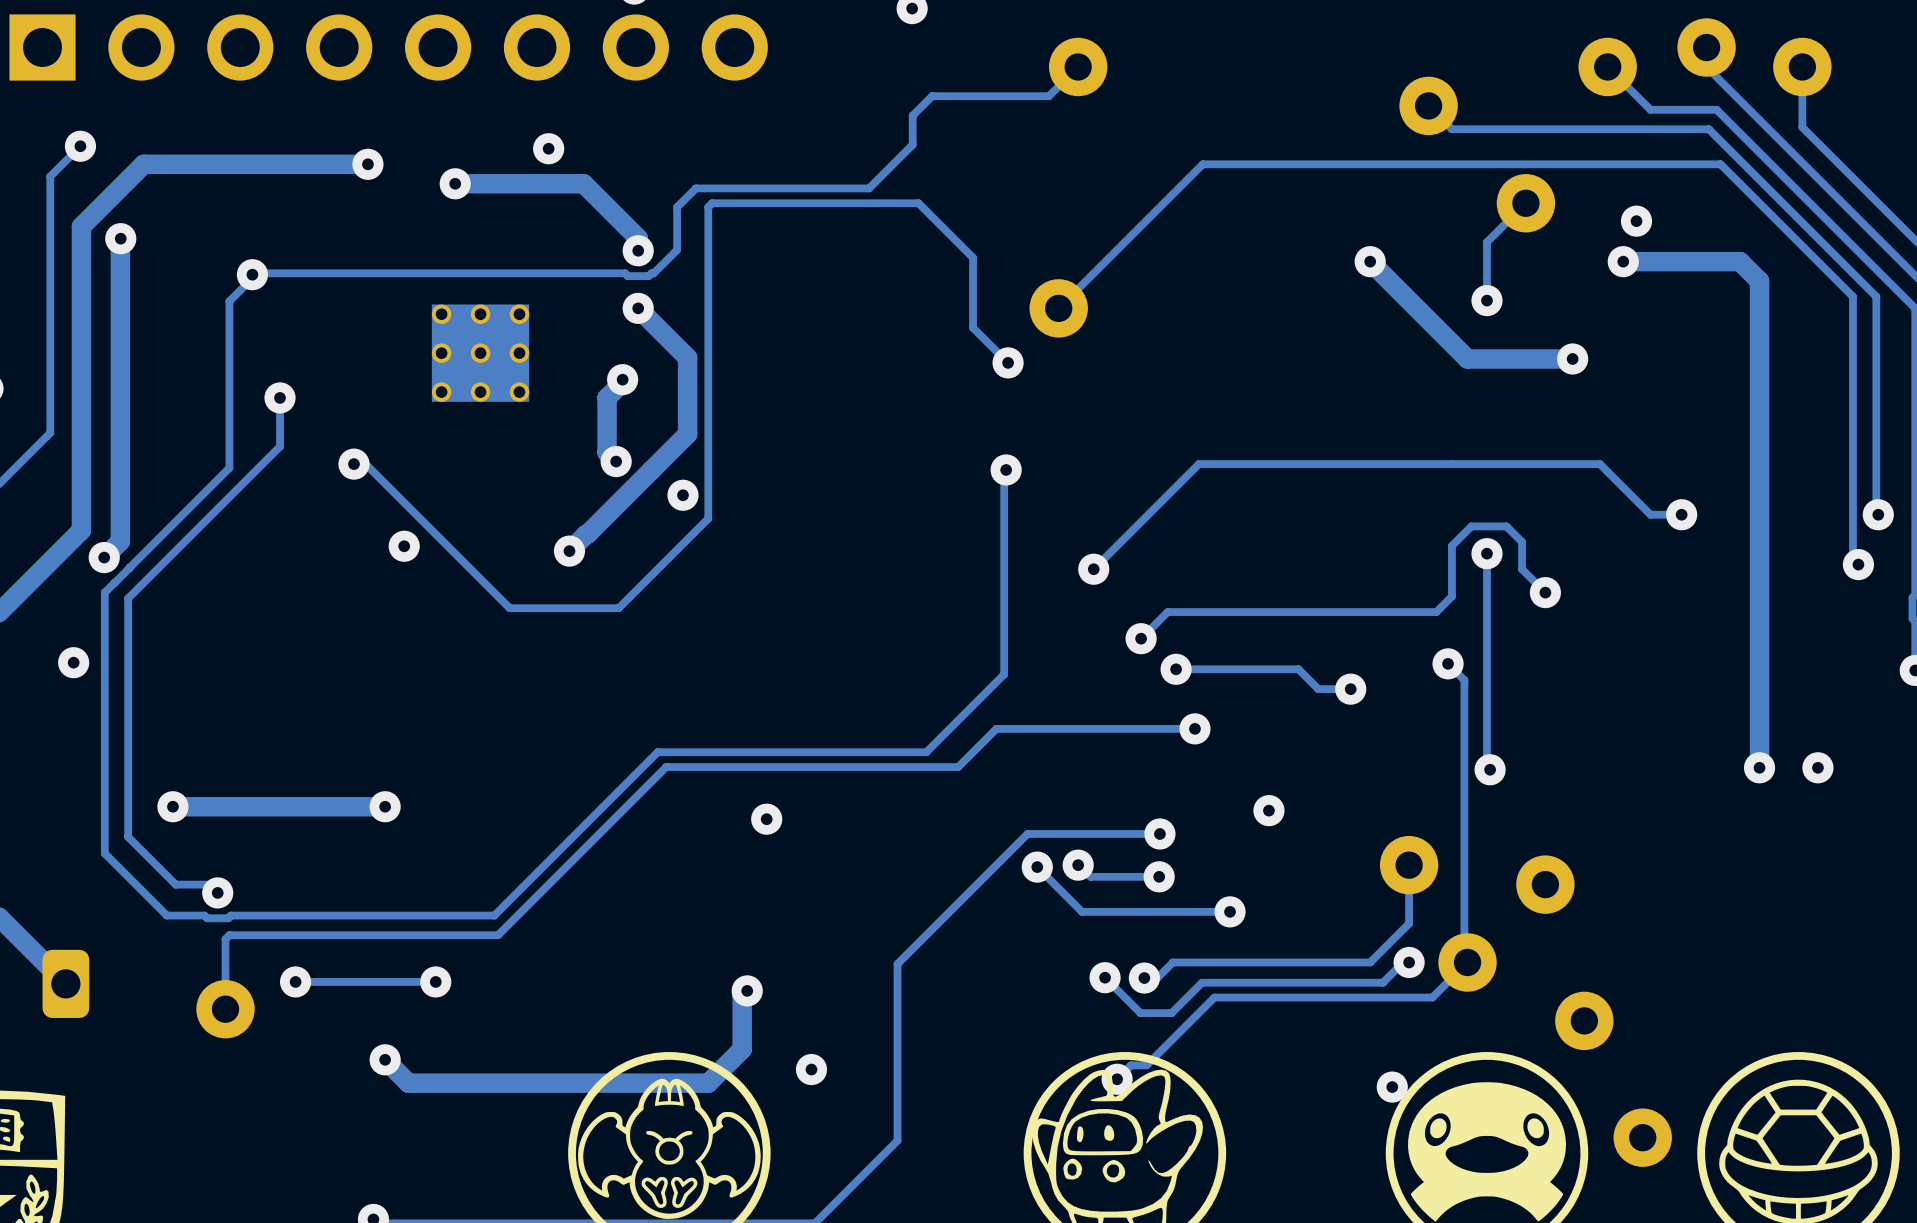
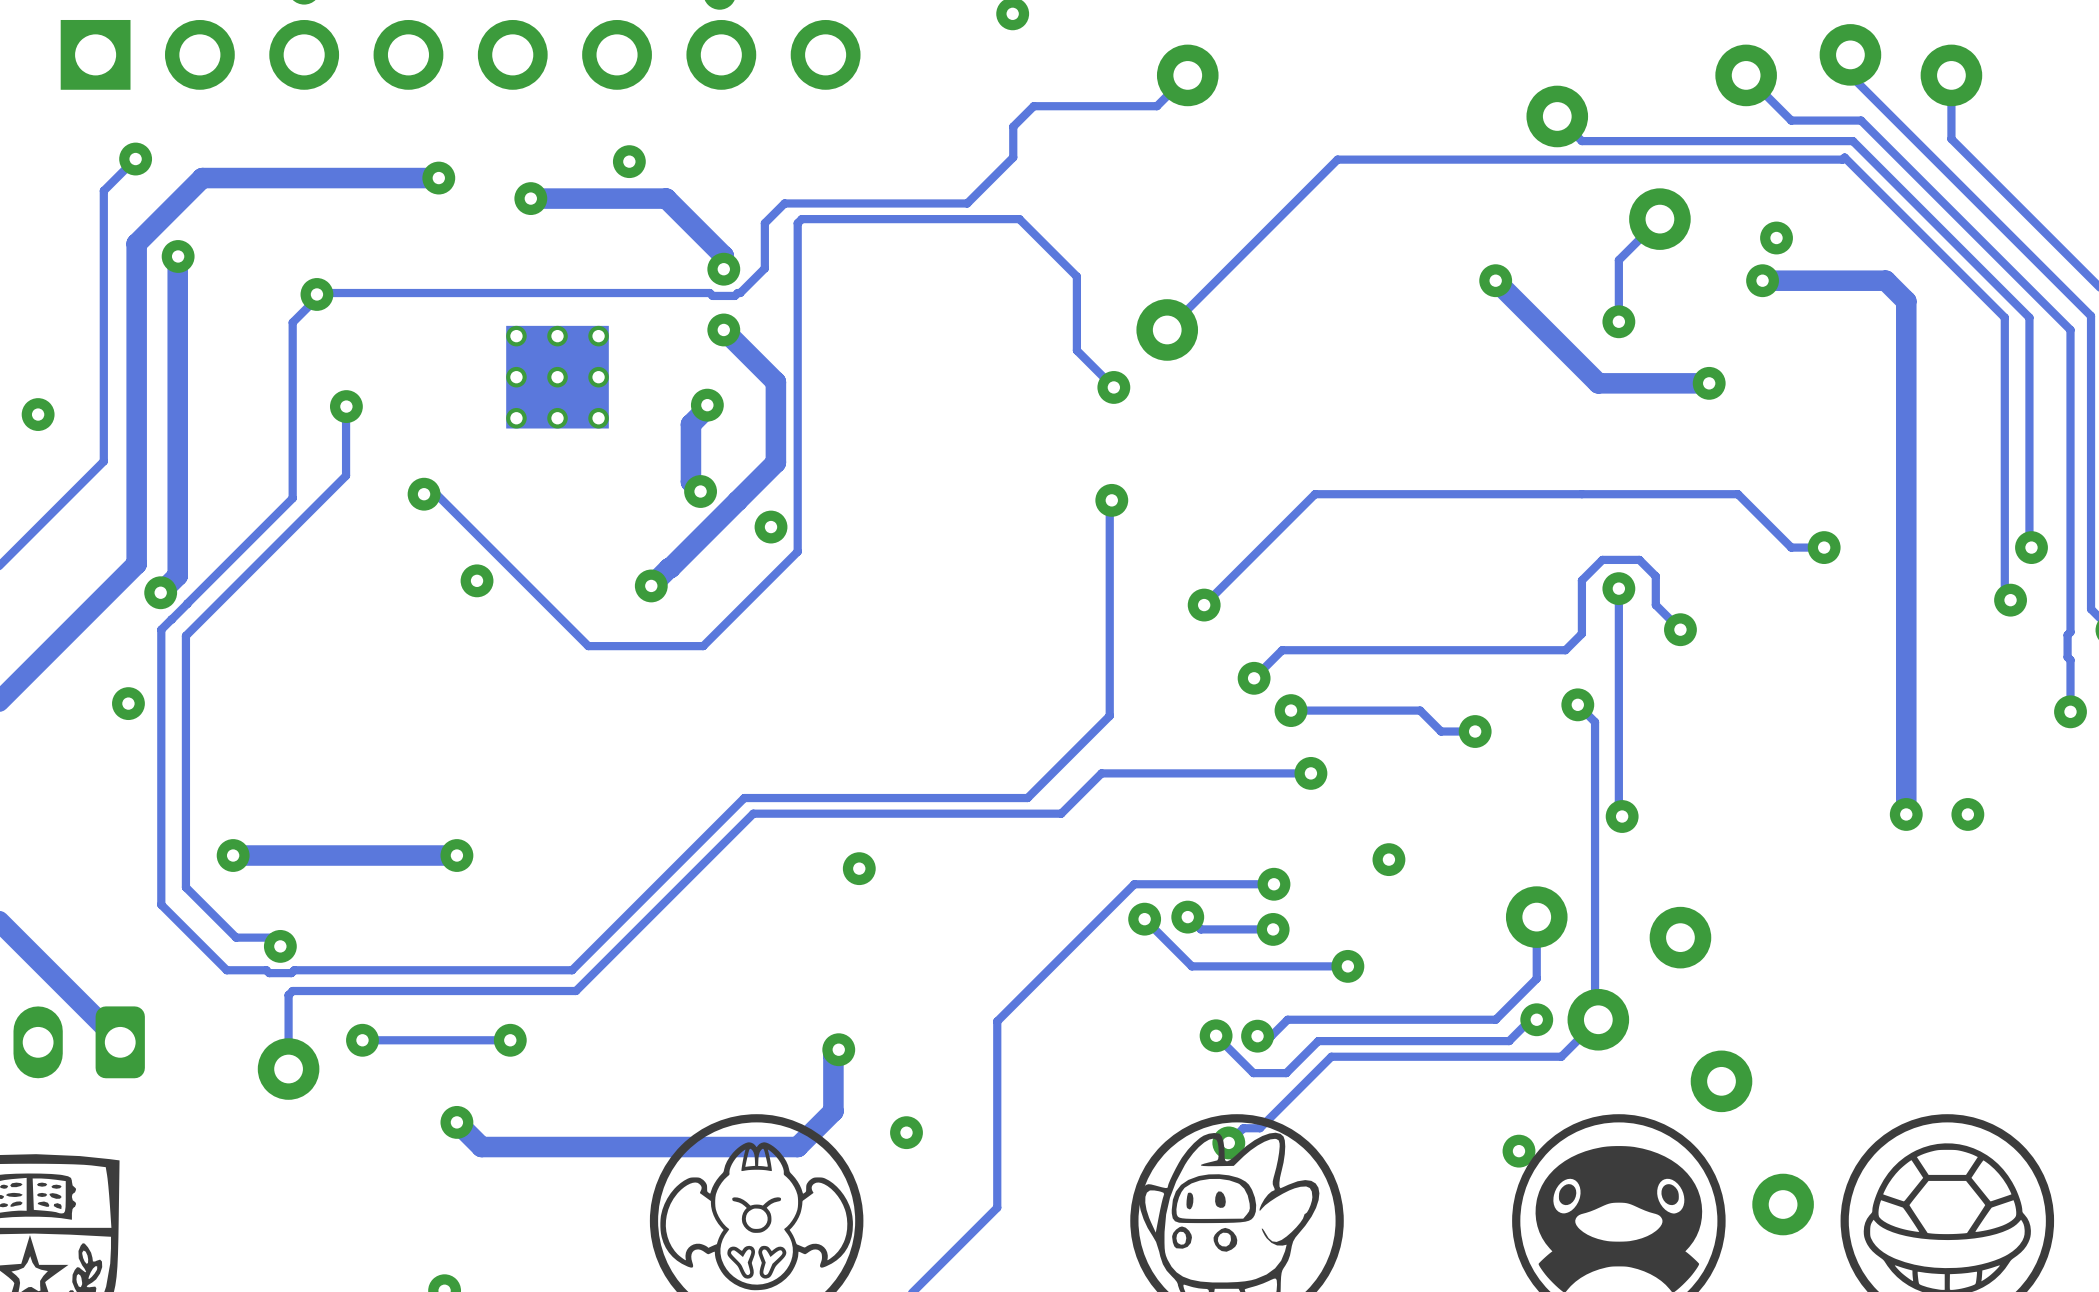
track: (1720, 164) (1202, 164) -> (1865, 178) (1844, 157) (1842, 159) (1337, 159) (1319, 178)
via position: (280, 397) -> (346, 406)

